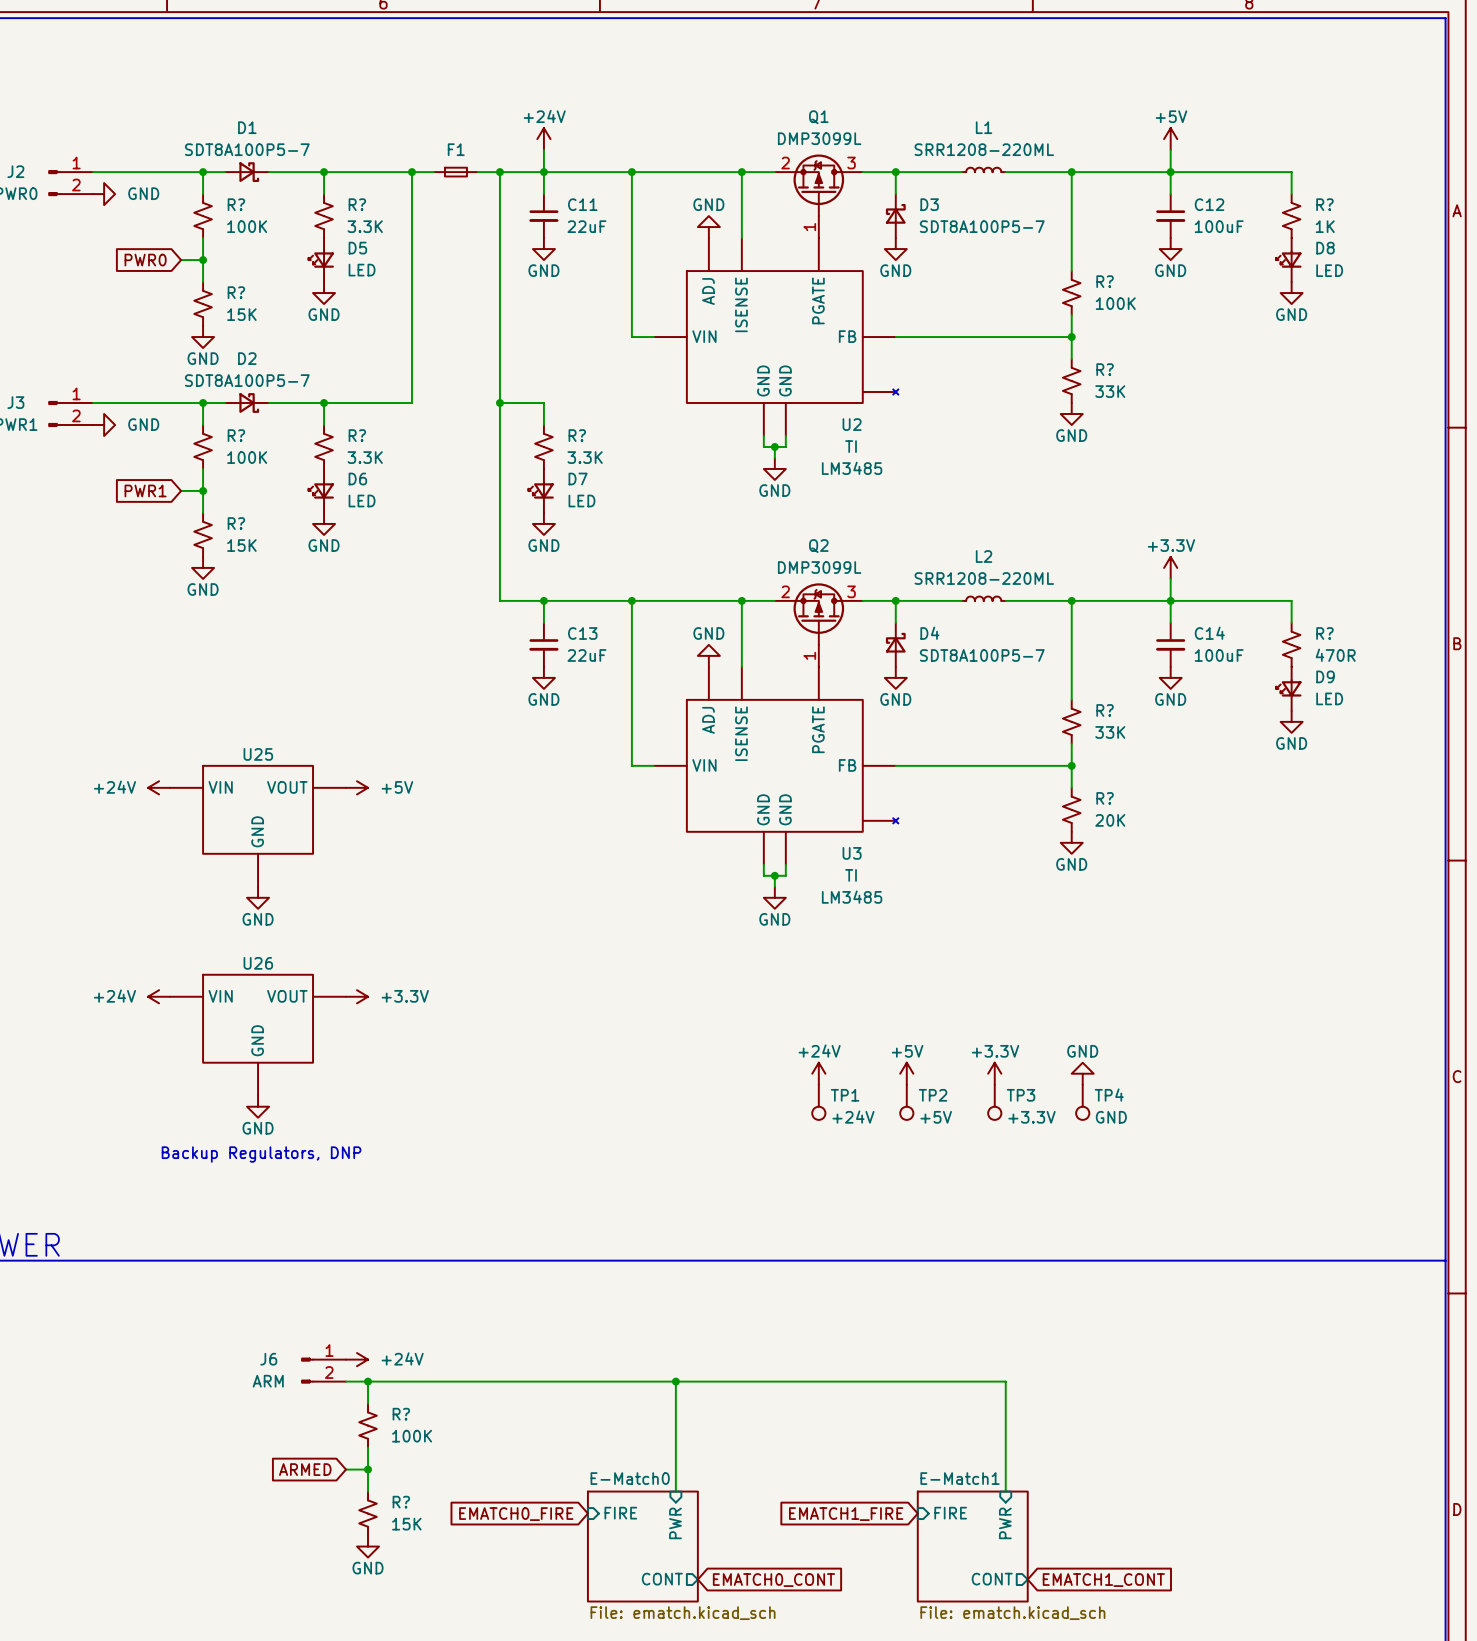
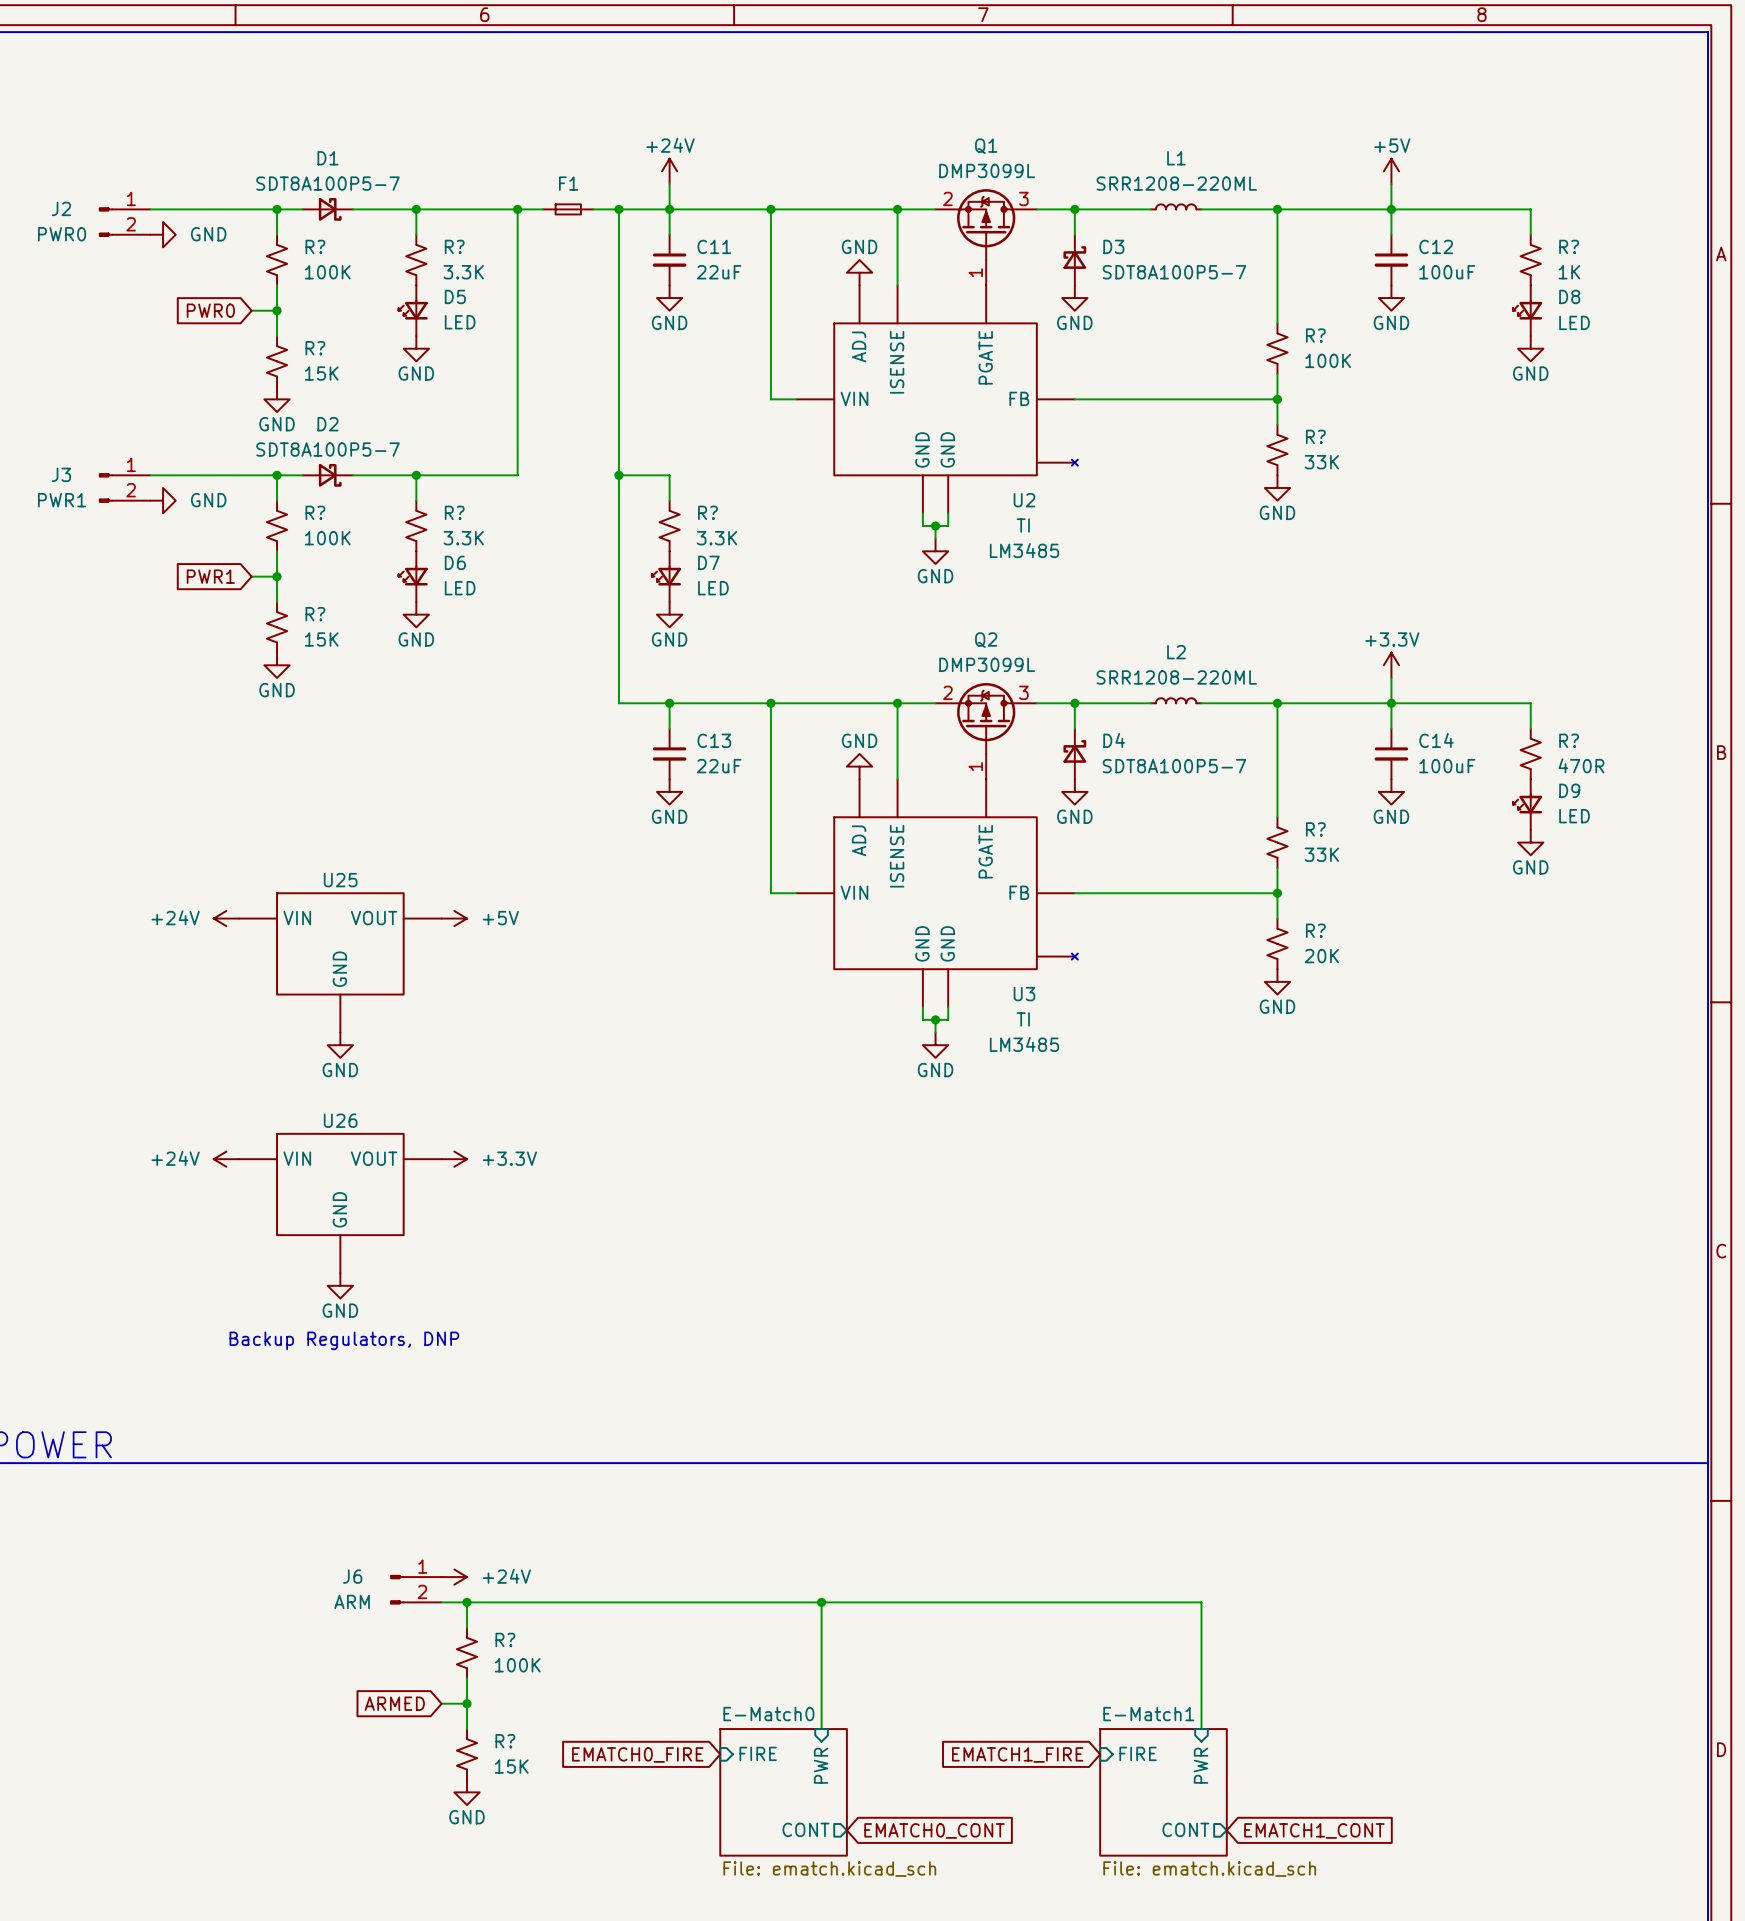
power symbol: +24V (818, 1073) -> none
power symbol: +5V (906, 1073) -> none
power symbol: +3.3V (994, 1073) -> none
power symbol: GND (1082, 1073) -> none
TP1: +24V (818, 1102) -> none
TP2: +5V (906, 1102) -> none
TP3: +3.3V (994, 1102) -> none
TP4: GND (1082, 1102) -> none

